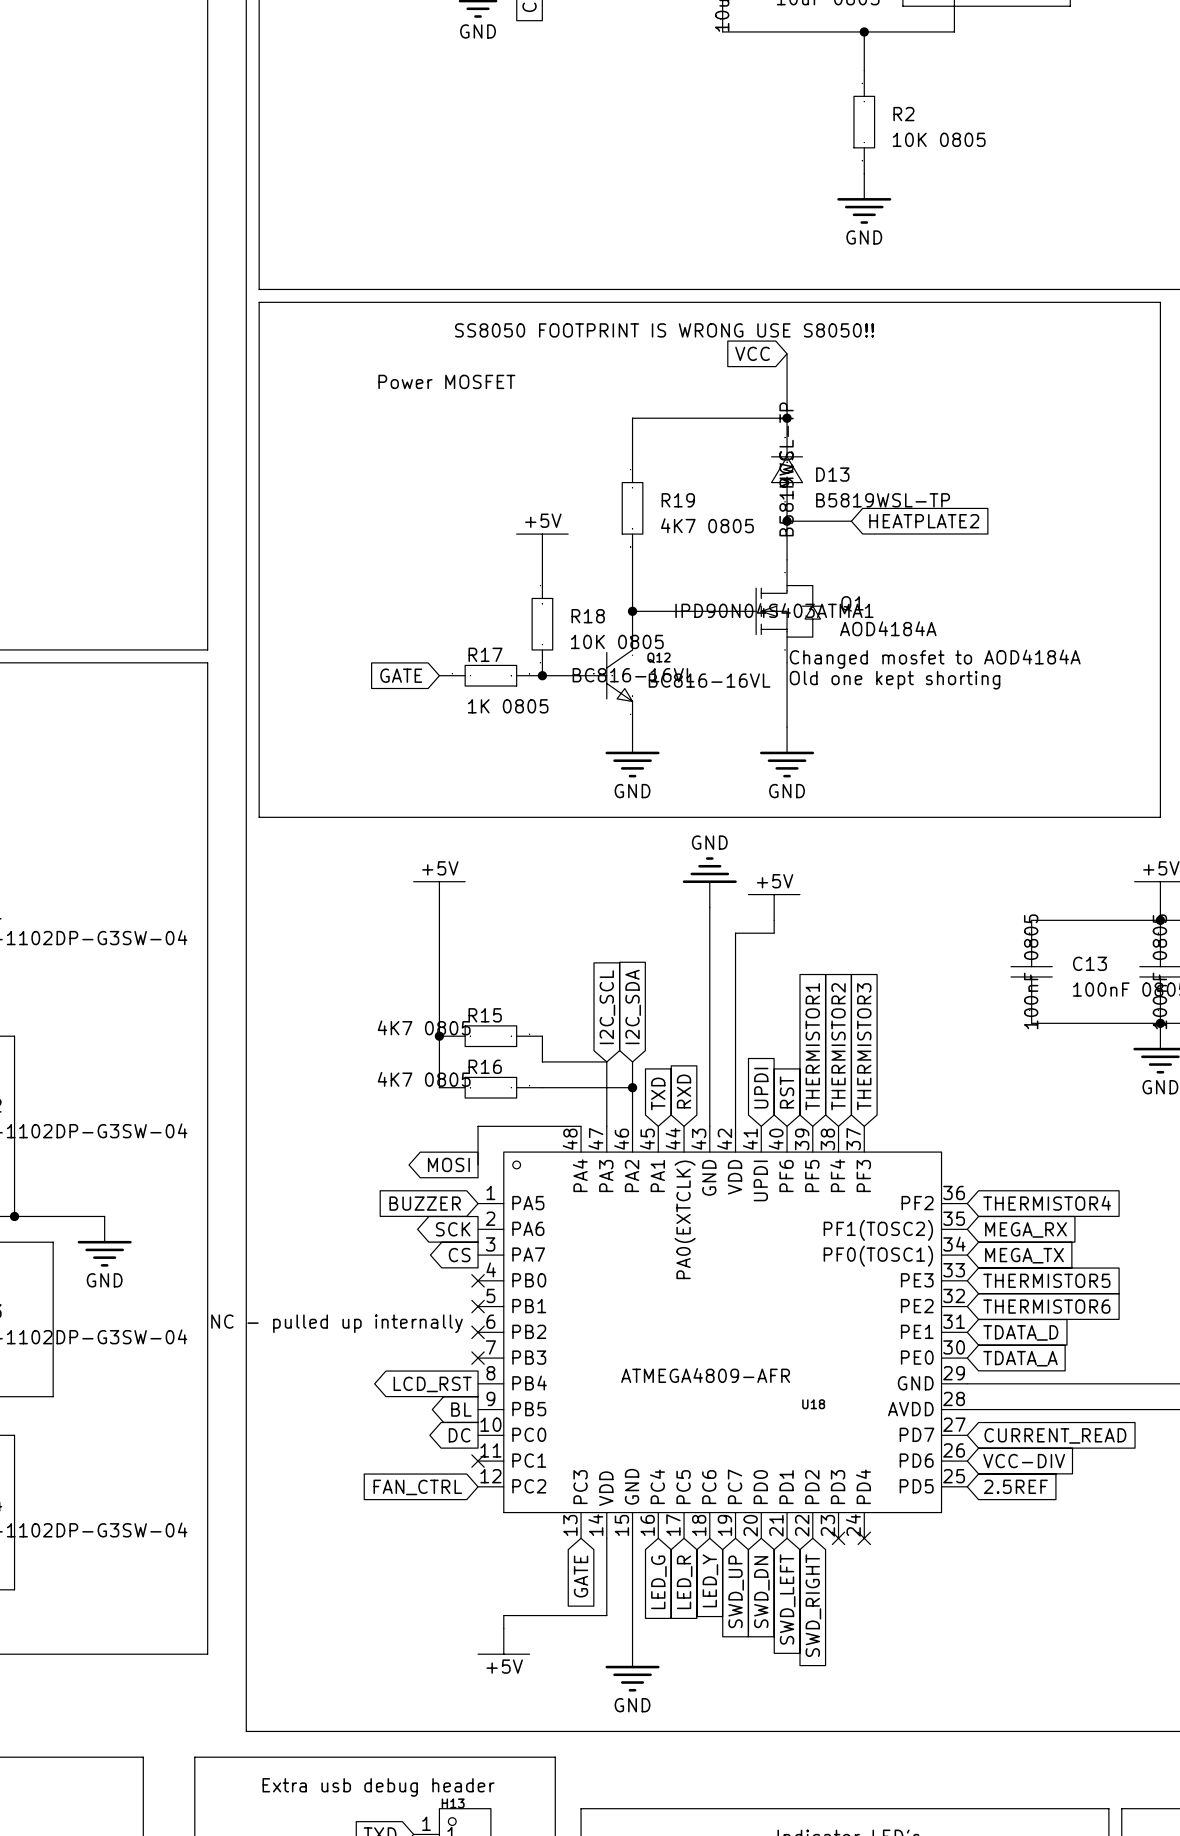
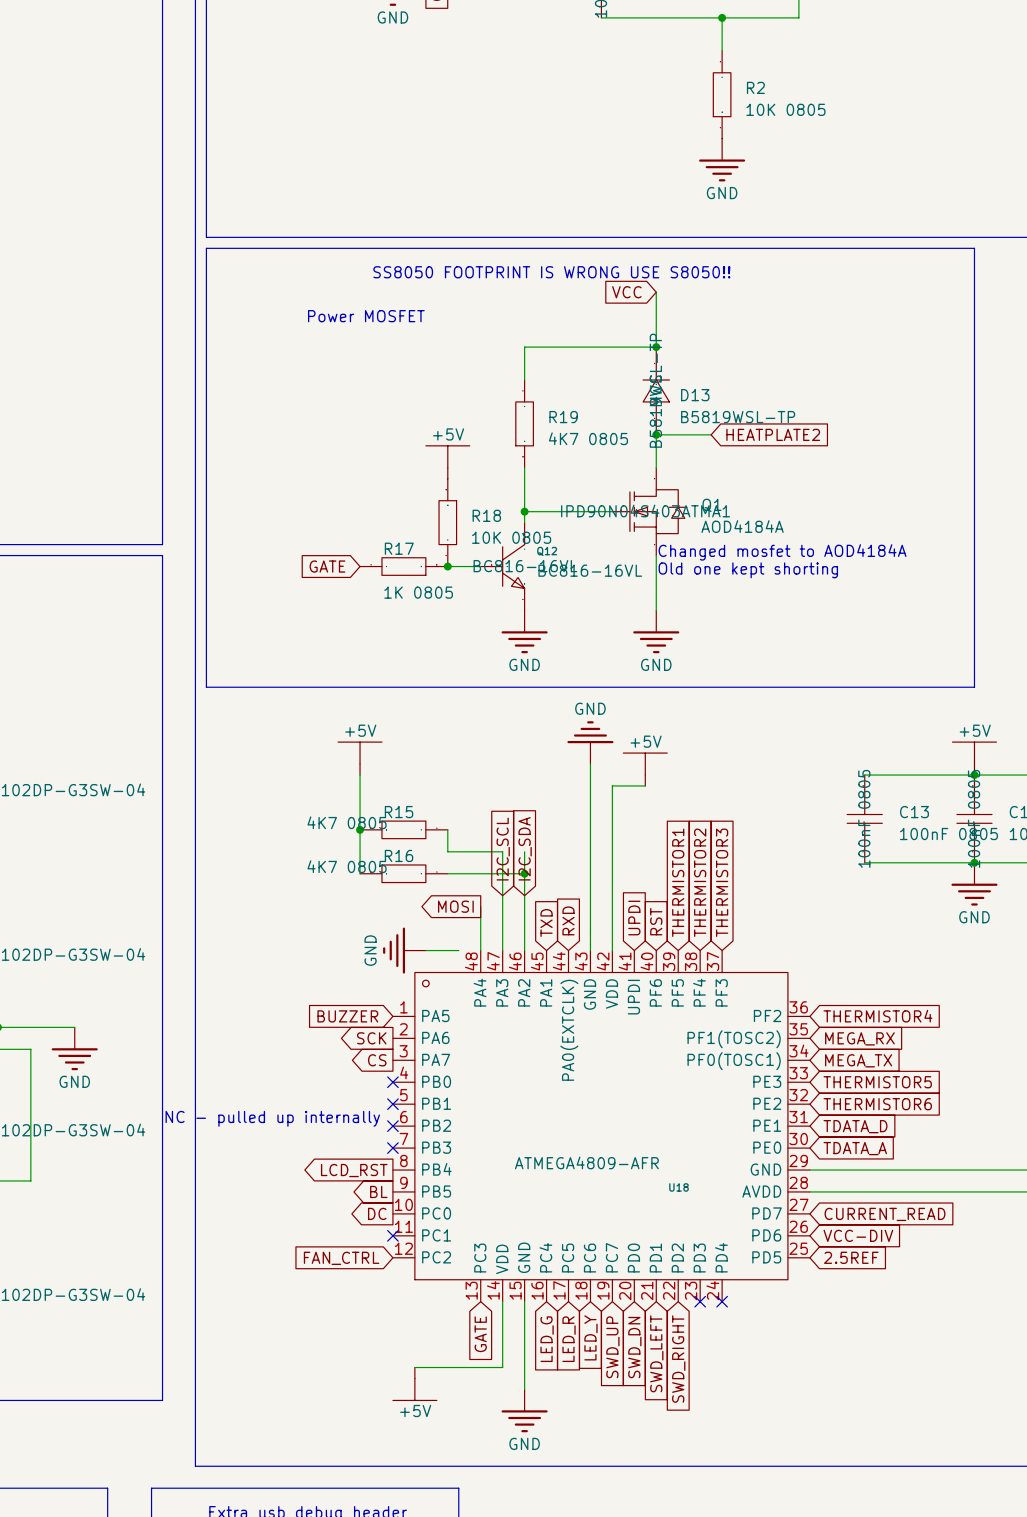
R15: none -> 4K7 0805 (403, 829)
wire: none -> (447, 829) (447, 851) (502, 851) (502, 895)
R15 name: R15 (485, 1015) -> R16 (399, 855)
wire: (439, 1036) (439, 1087) -> (524, 851) (524, 895)
junction position: (439, 1036) -> (360, 829)
wire: (542, 1036) (542, 1061) (606, 1061) -> (447, 873) (524, 873)
R16: 4K7 0805 (490, 1087) -> none
wire: (542, 1087) (632, 1087) -> none
junction position: (632, 1087) -> (524, 873)
power symbol: none -> GND (404, 950)
wire: (516, 1126) (478, 1126) (478, 1164) -> none
wire: (555, 1126) (581, 1126) -> (480, 906) (480, 950)
global label position: MOSI (448, 1164) -> MOSI (455, 906)

